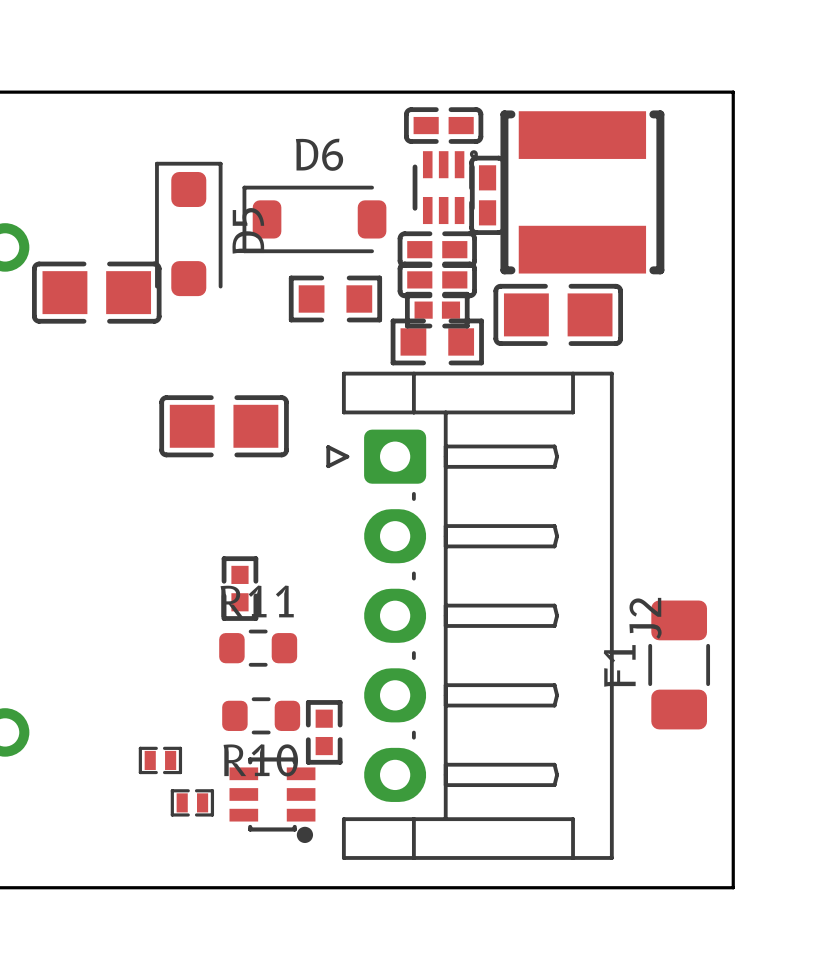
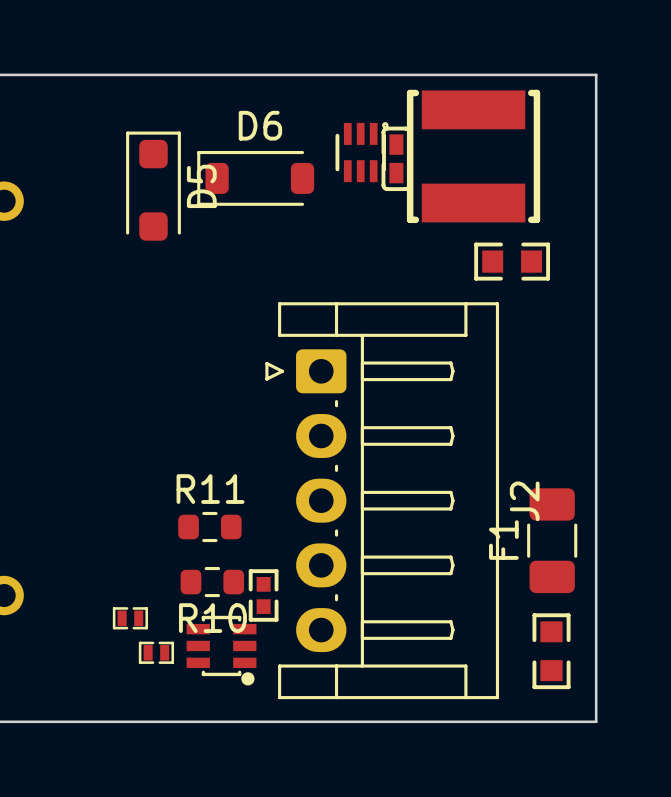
part: (443, 125) -> none
part: (437, 249) -> none
part: (437, 279) -> none
part: (96, 292) -> none
part: (335, 298) -> none
part: (437, 310) -> none
part: (558, 314) -> none
part: none -> (512, 261)
part: (437, 341) -> none
part: (224, 426) -> none
part: (239, 588) -> none
part: none -> (551, 651)

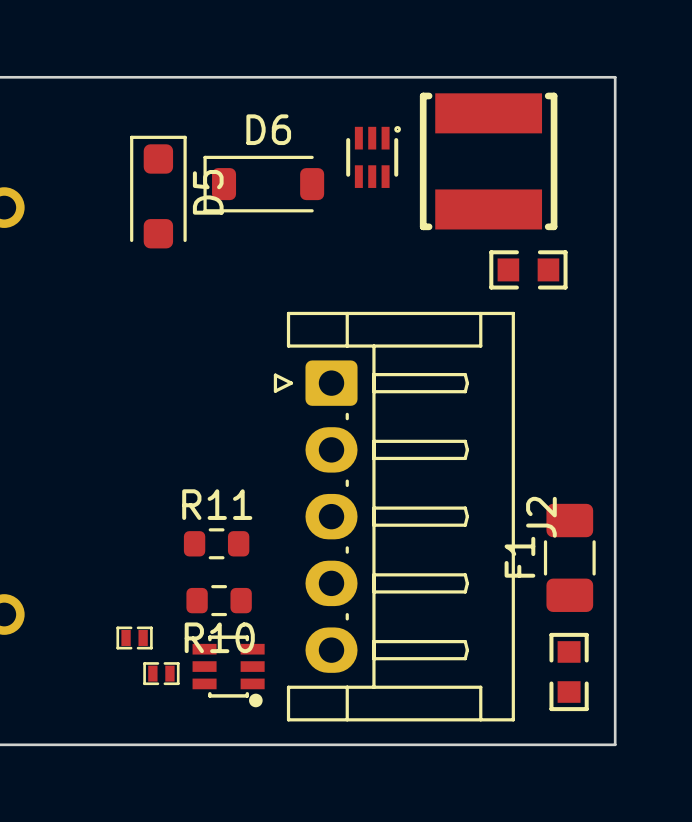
part: (396, 158) -> none
part: (263, 595) -> none

